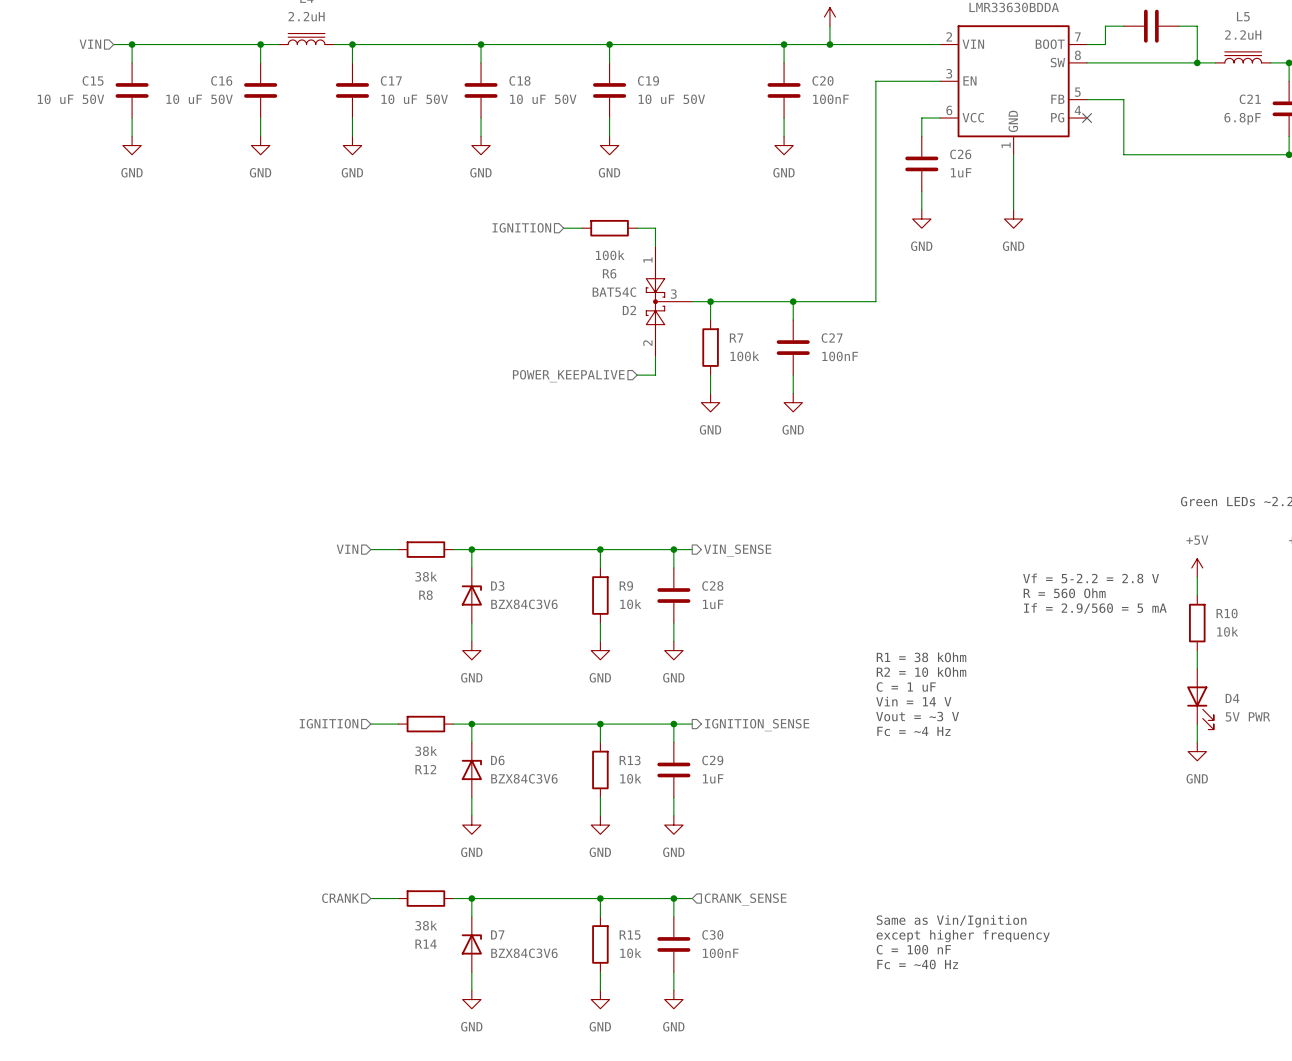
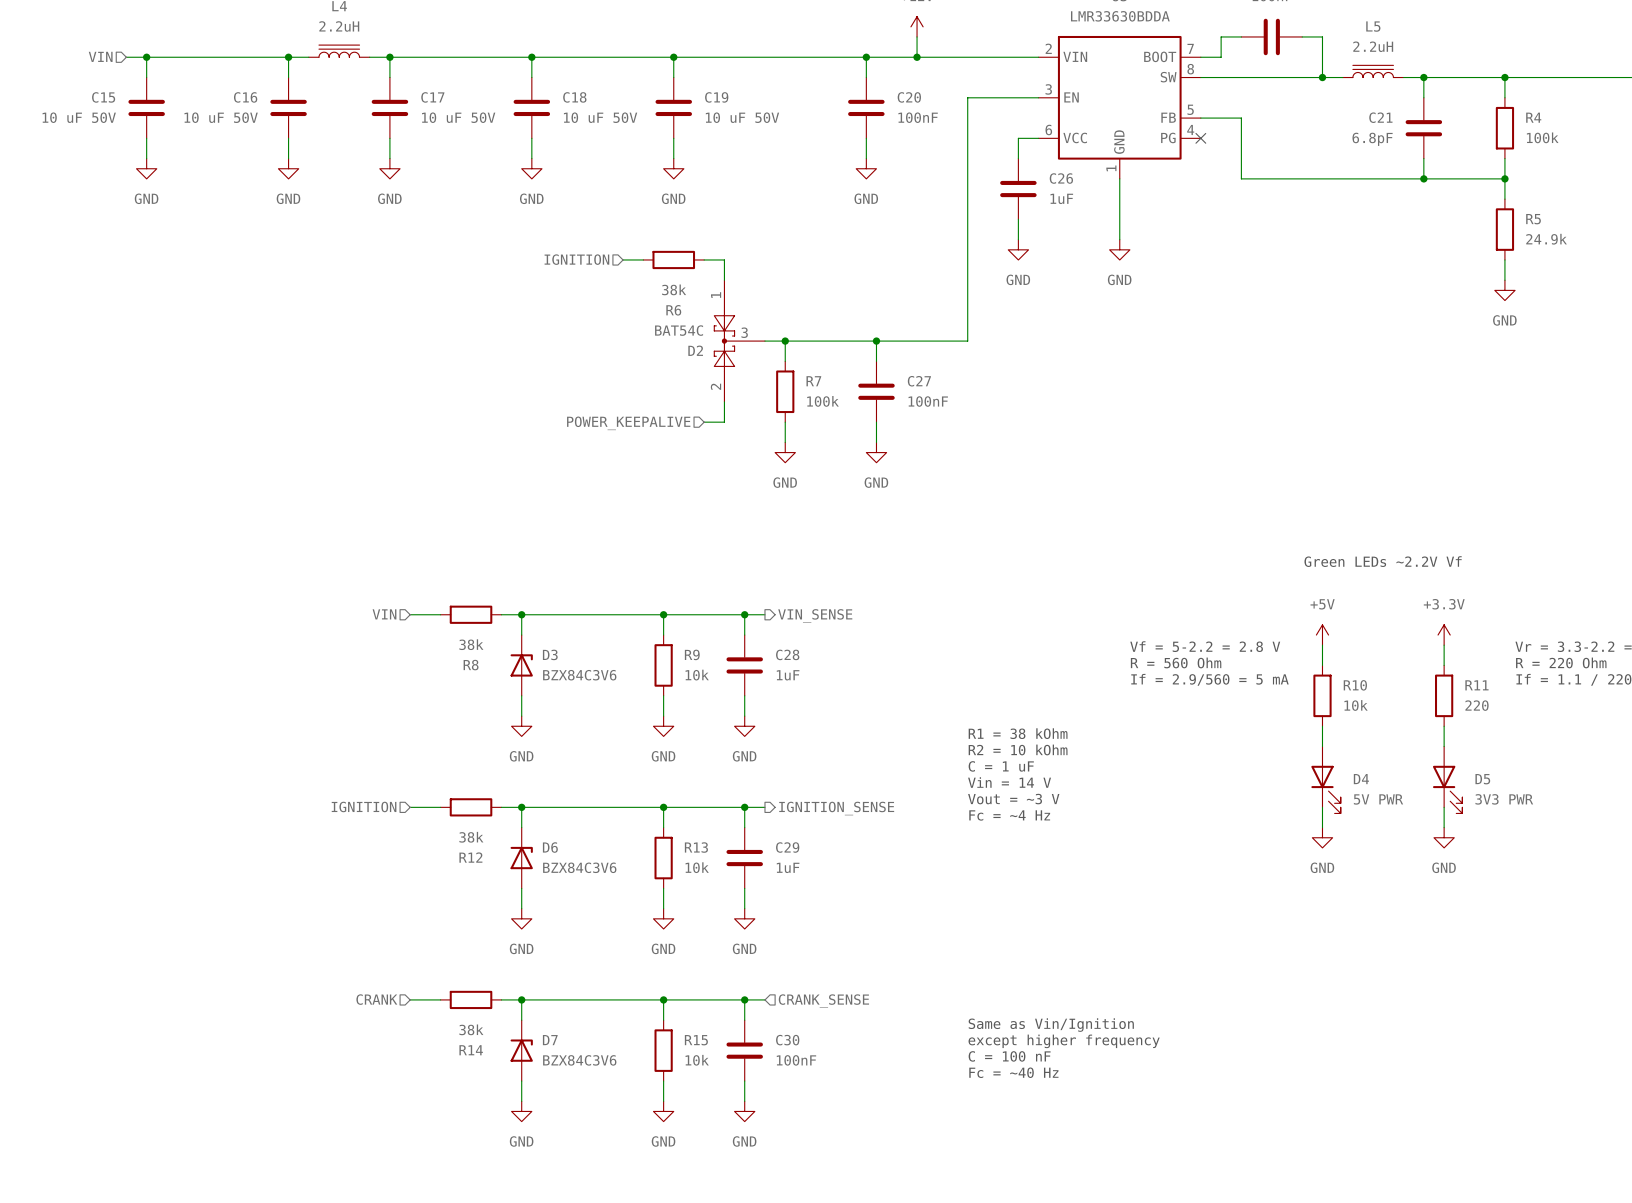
R6 value: 100k (610, 255) -> 38k (674, 289)

